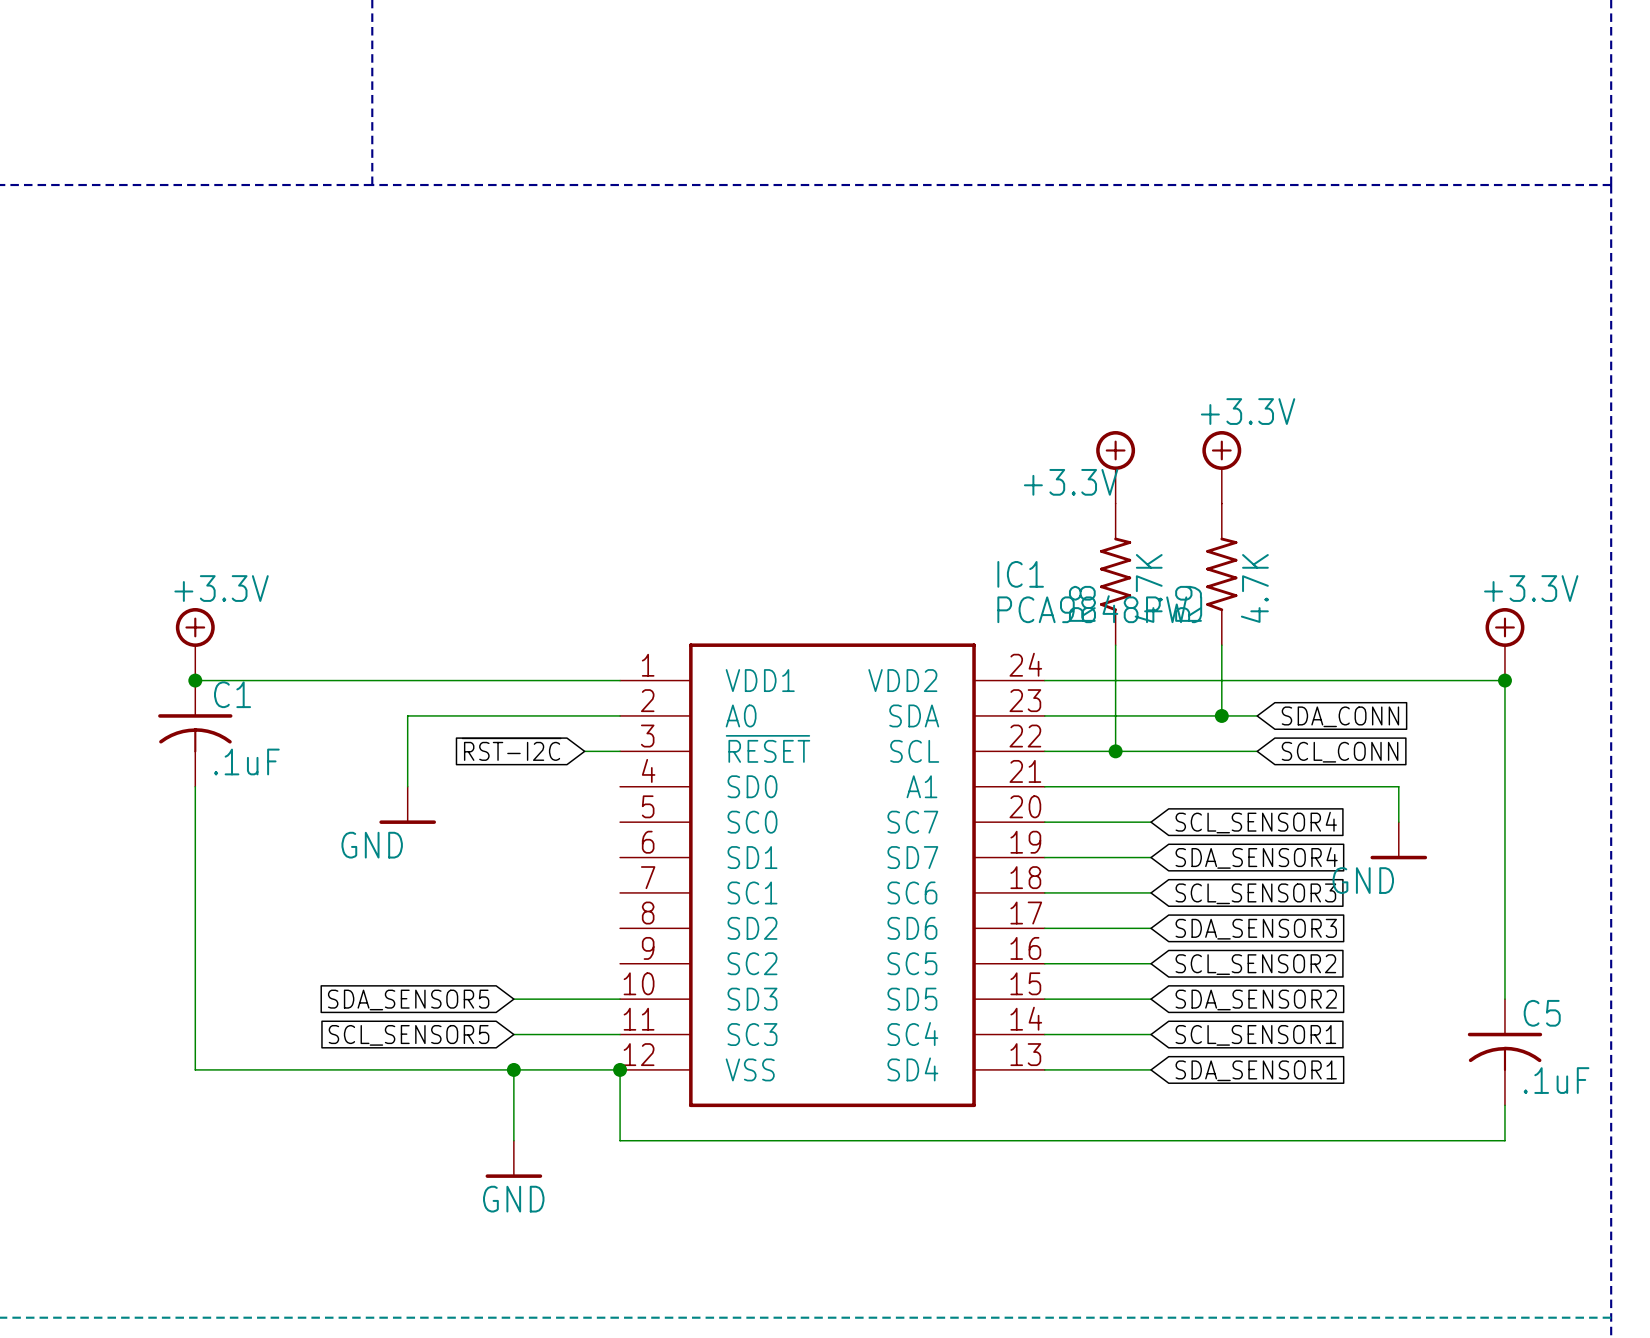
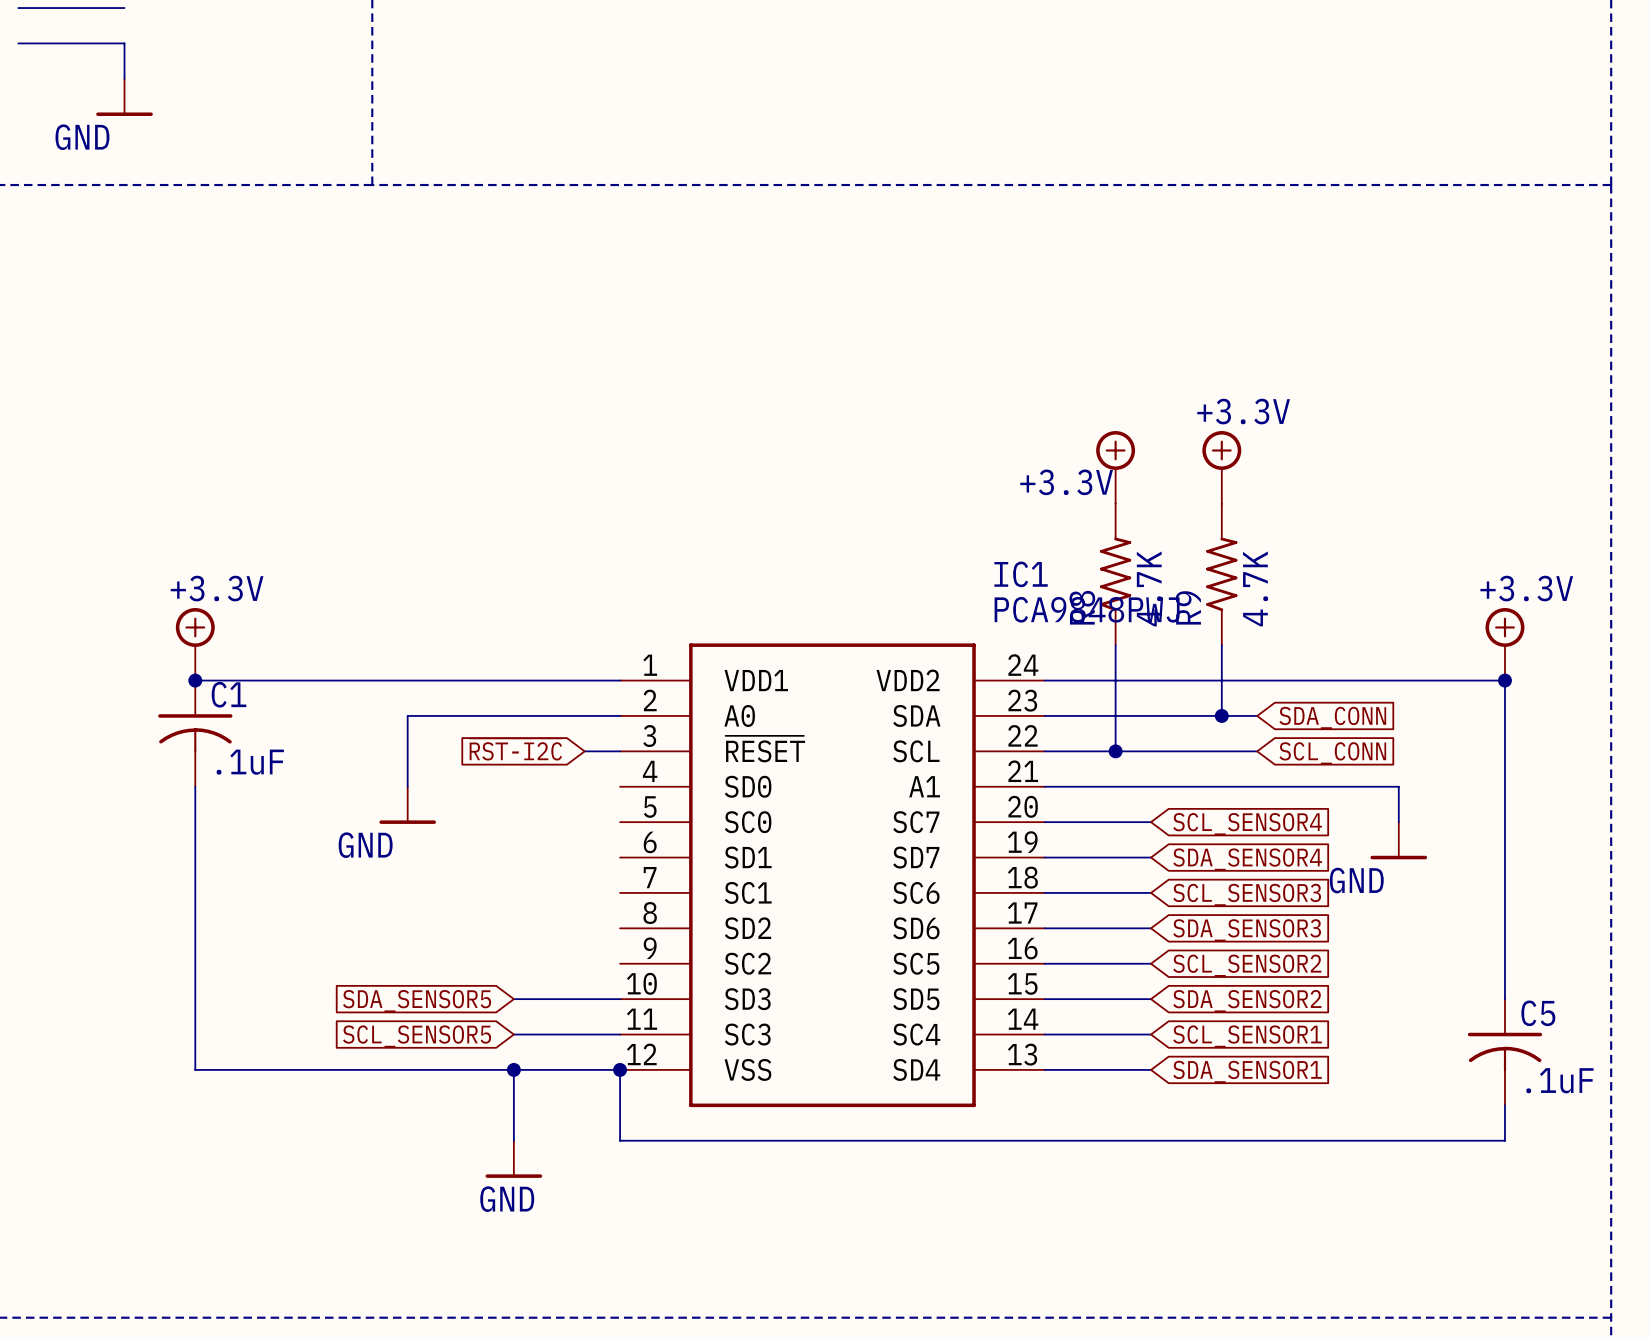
wire: none -> (18, 8) (124, 8)
wire: none -> (18, 43) (124, 43) (124, 78)
power symbol: none -> GND (124, 97)

